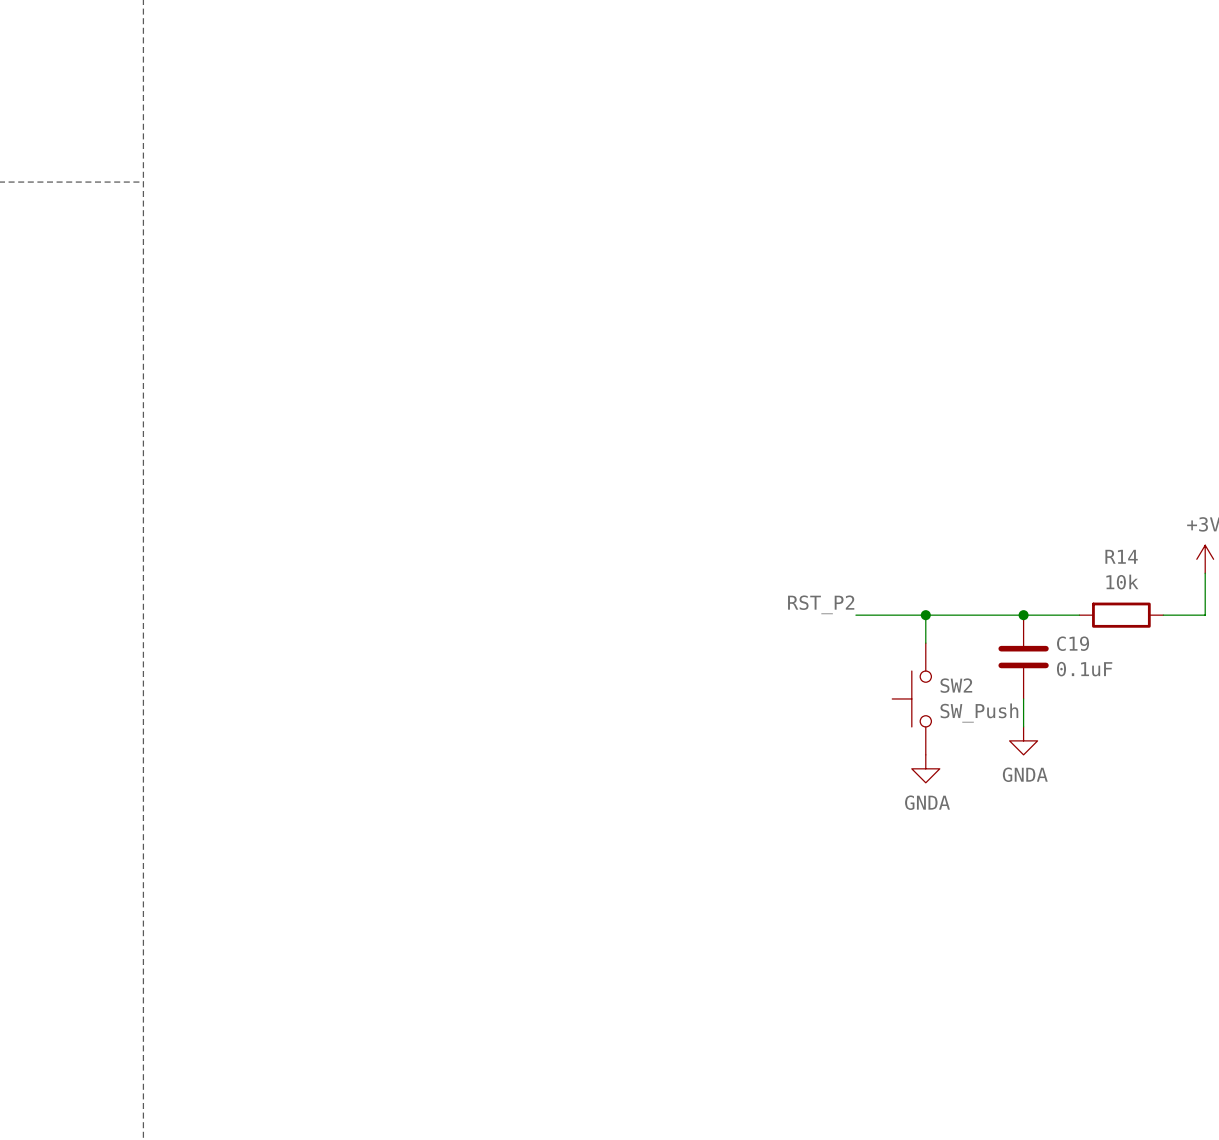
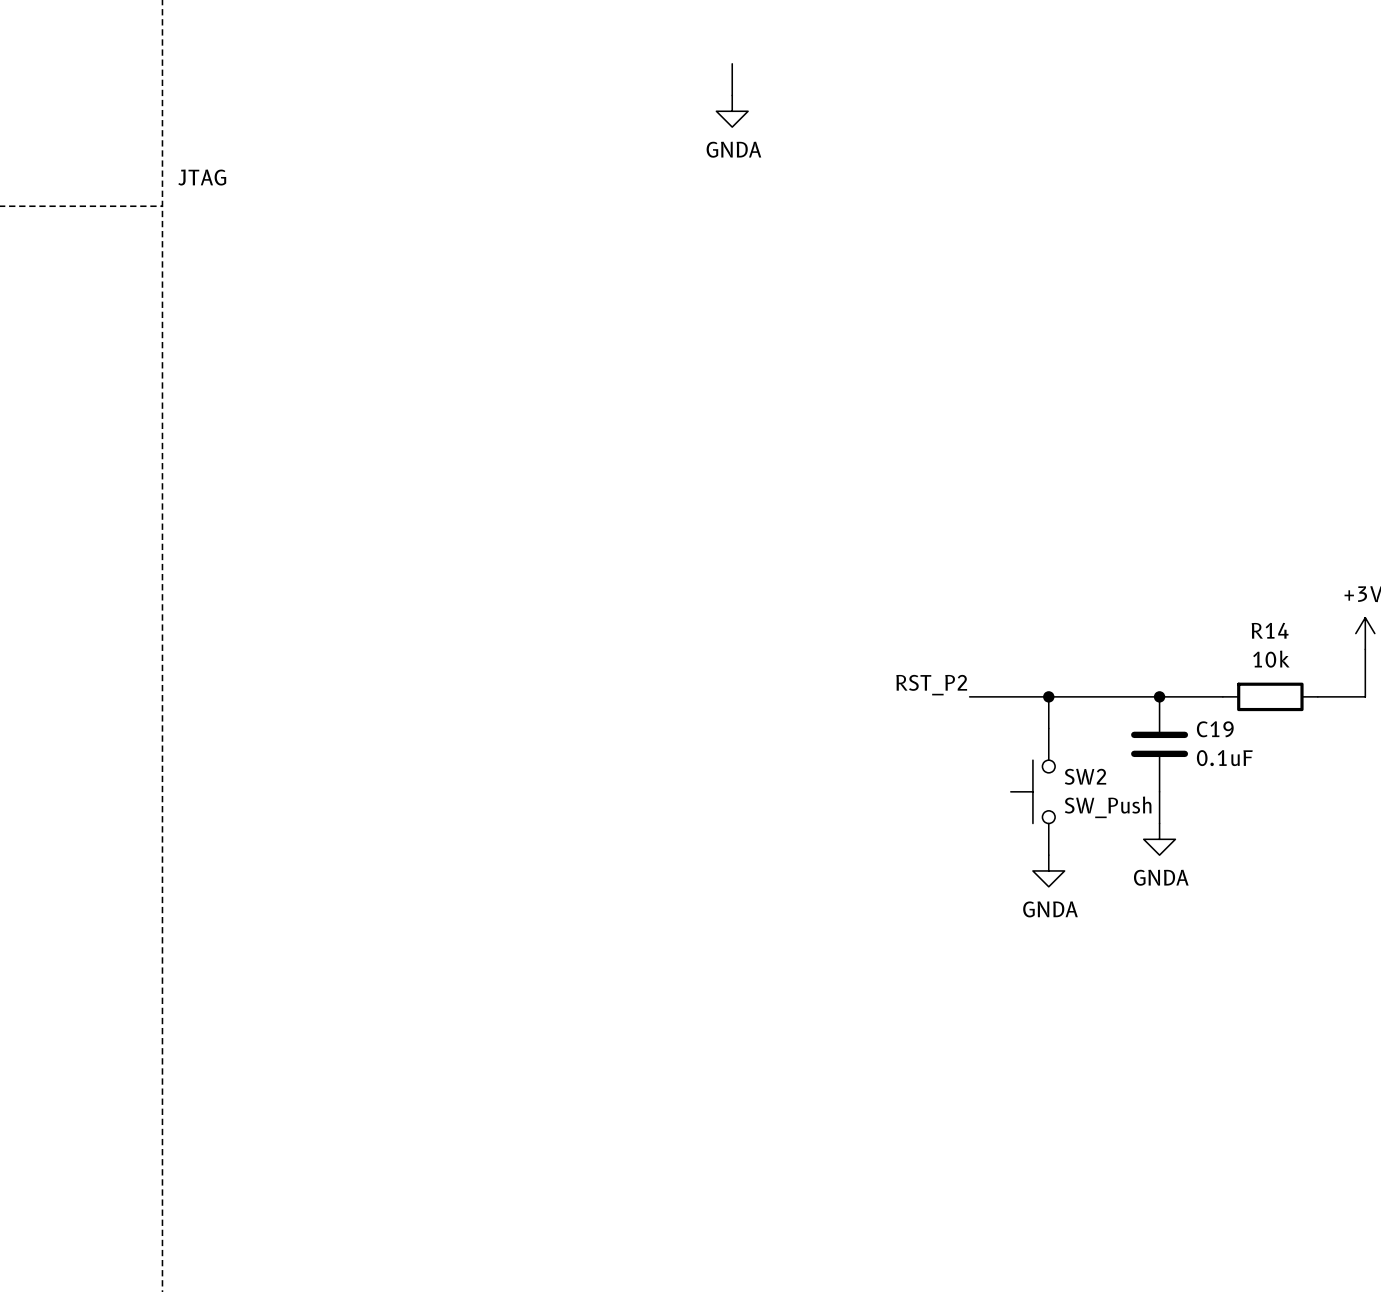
wire: none -> (732, 63) (732, 95)
power symbol: none -> GNDA (732, 111)
text: none -> JTAG (202, 177)

